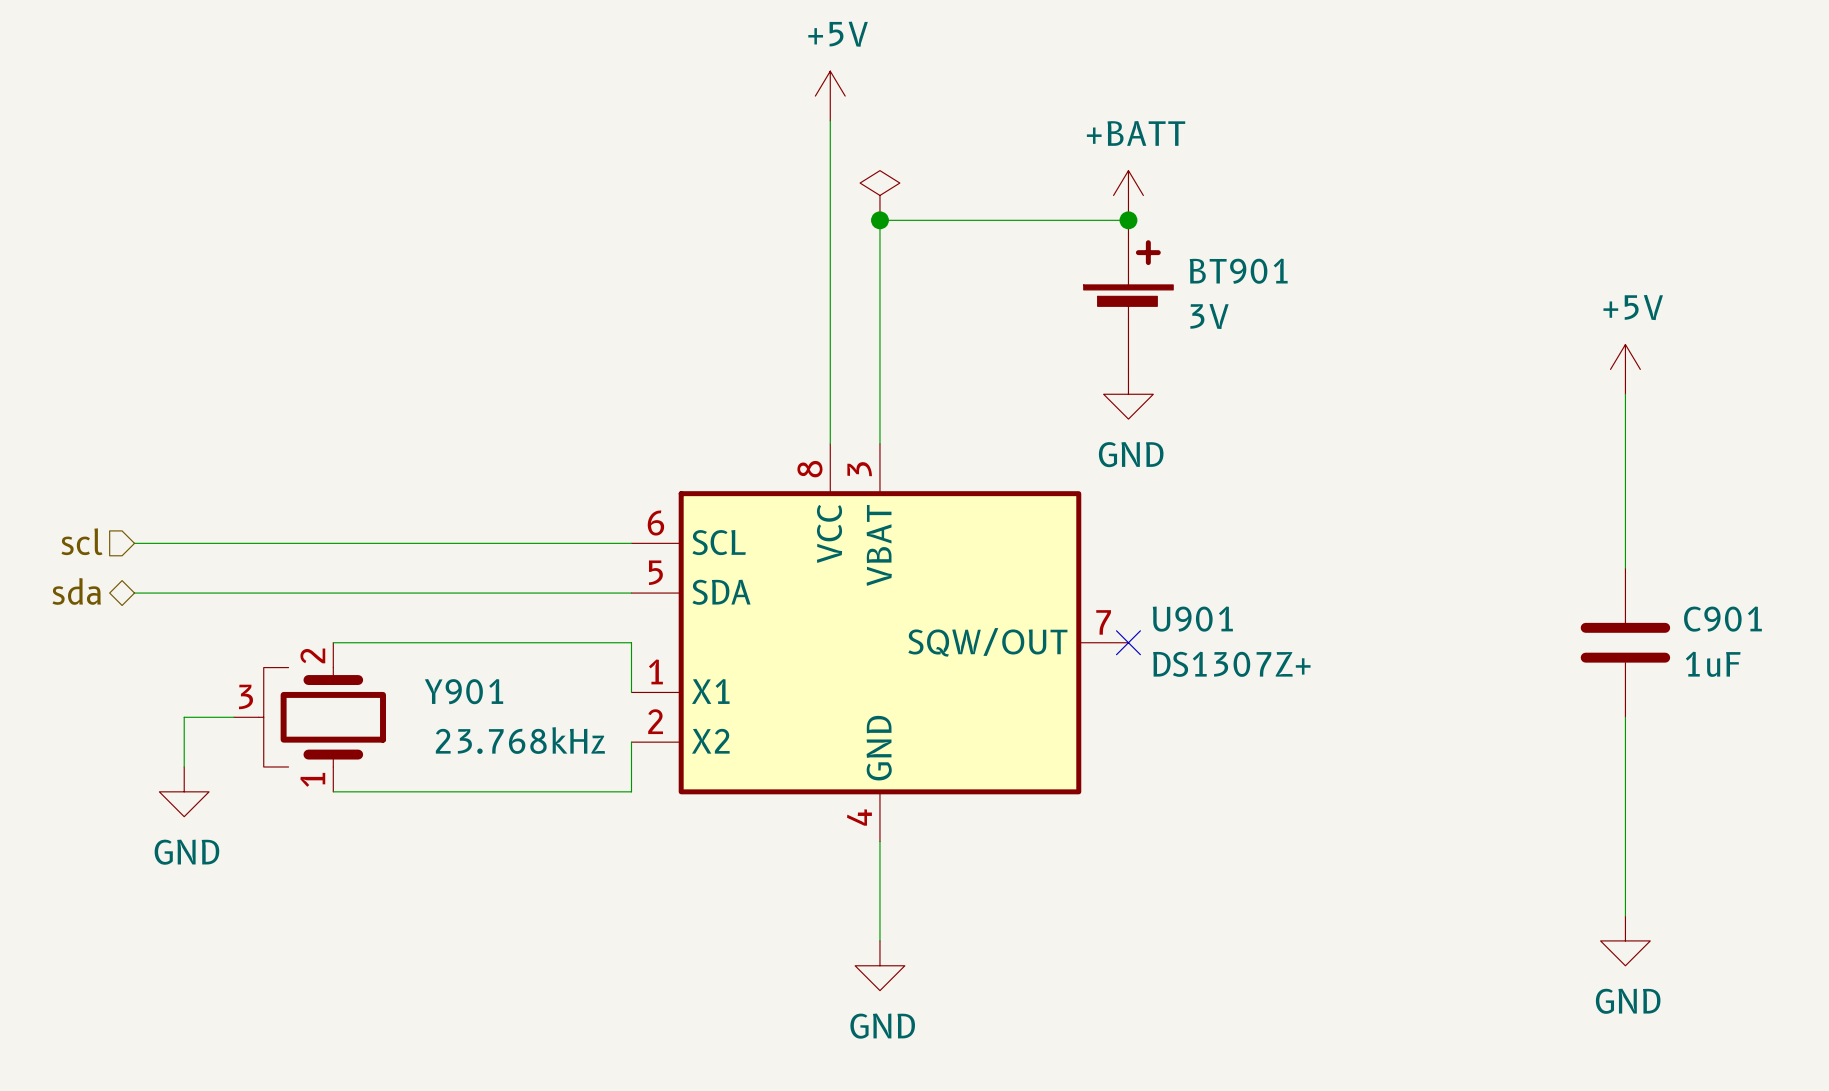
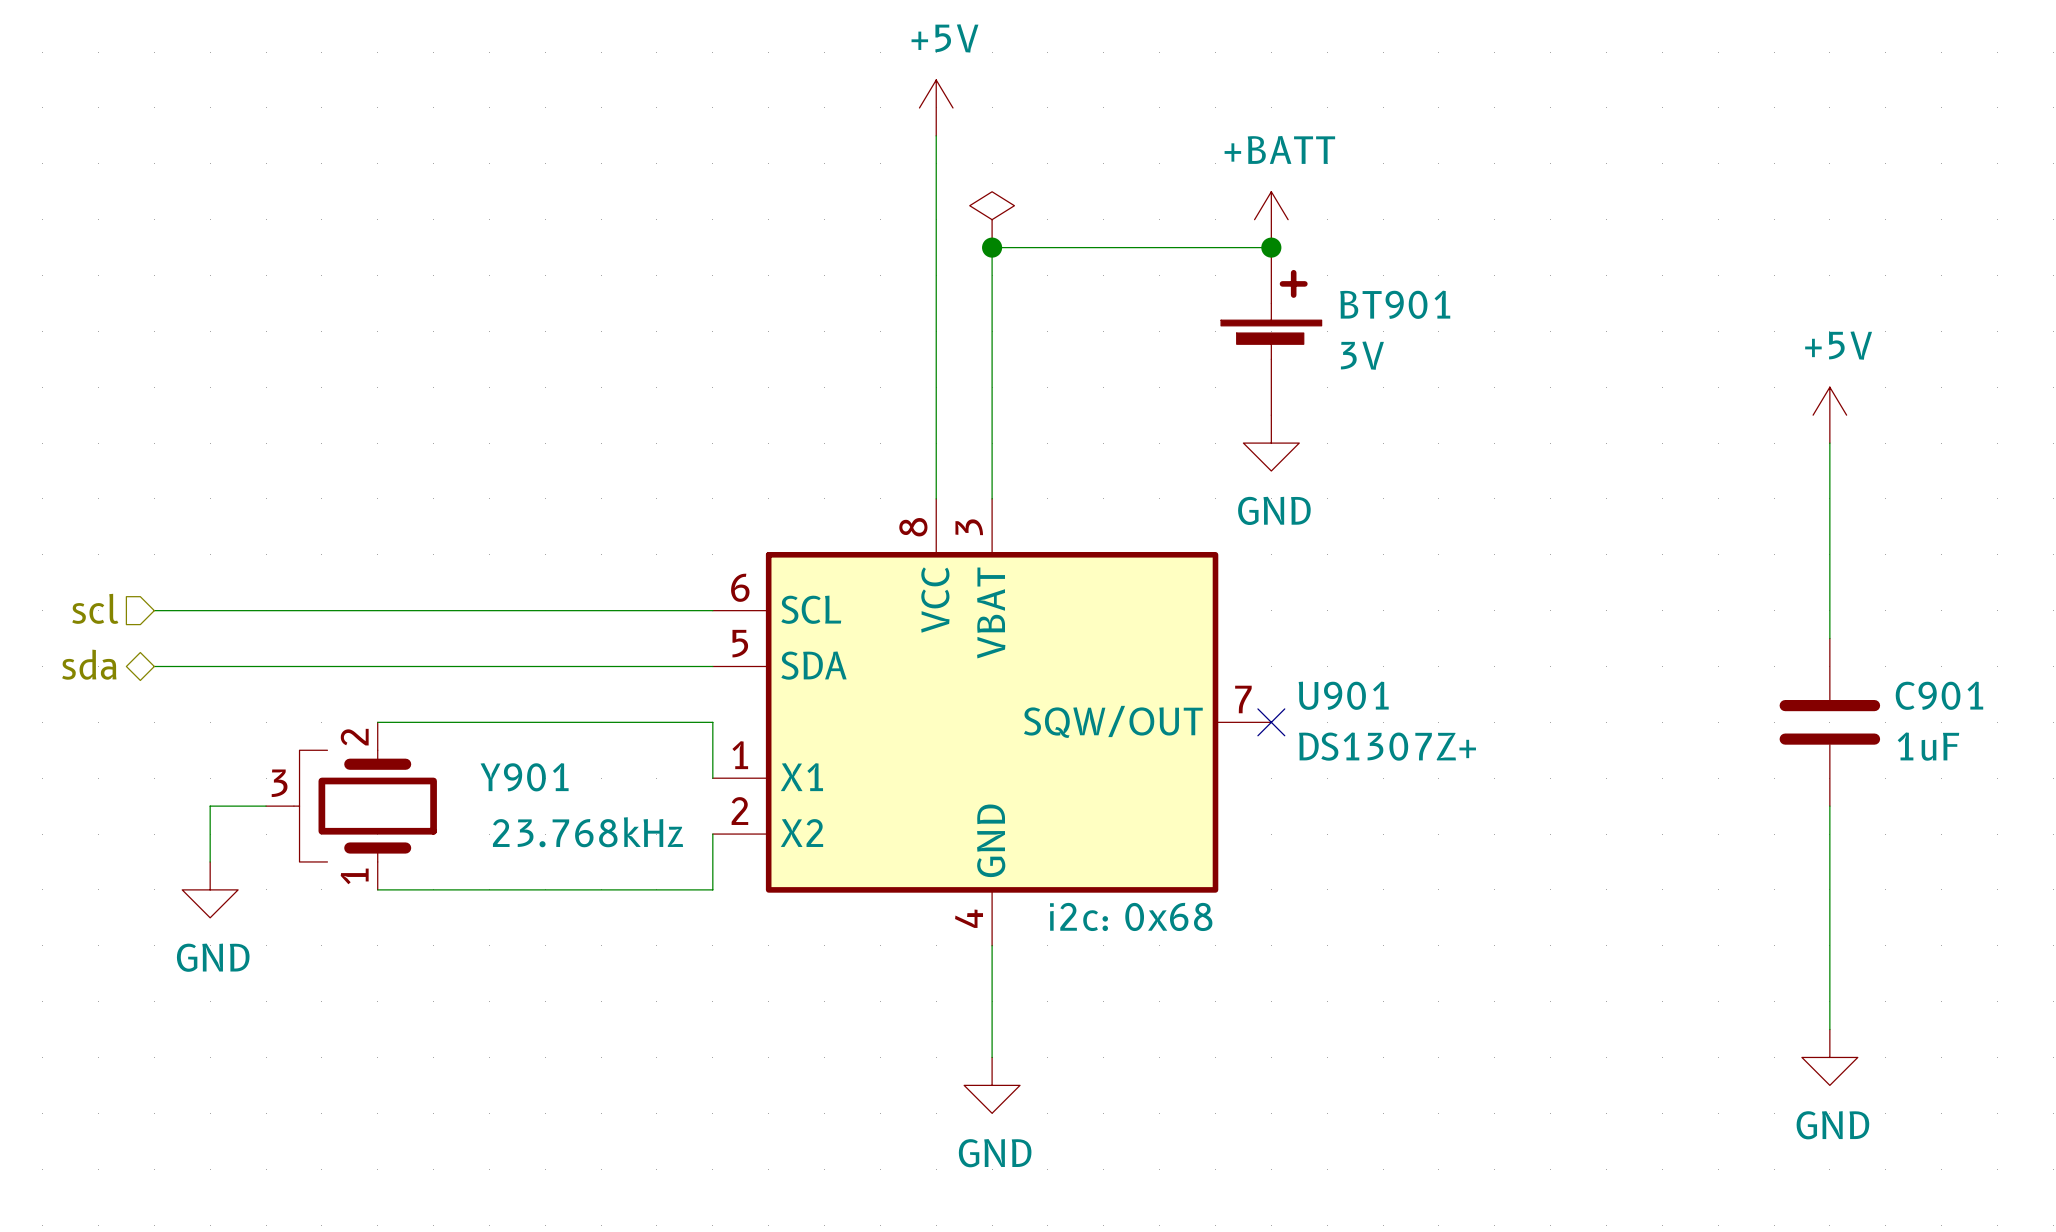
U901 text: none -> i2c: 0x68 (1131, 916)

